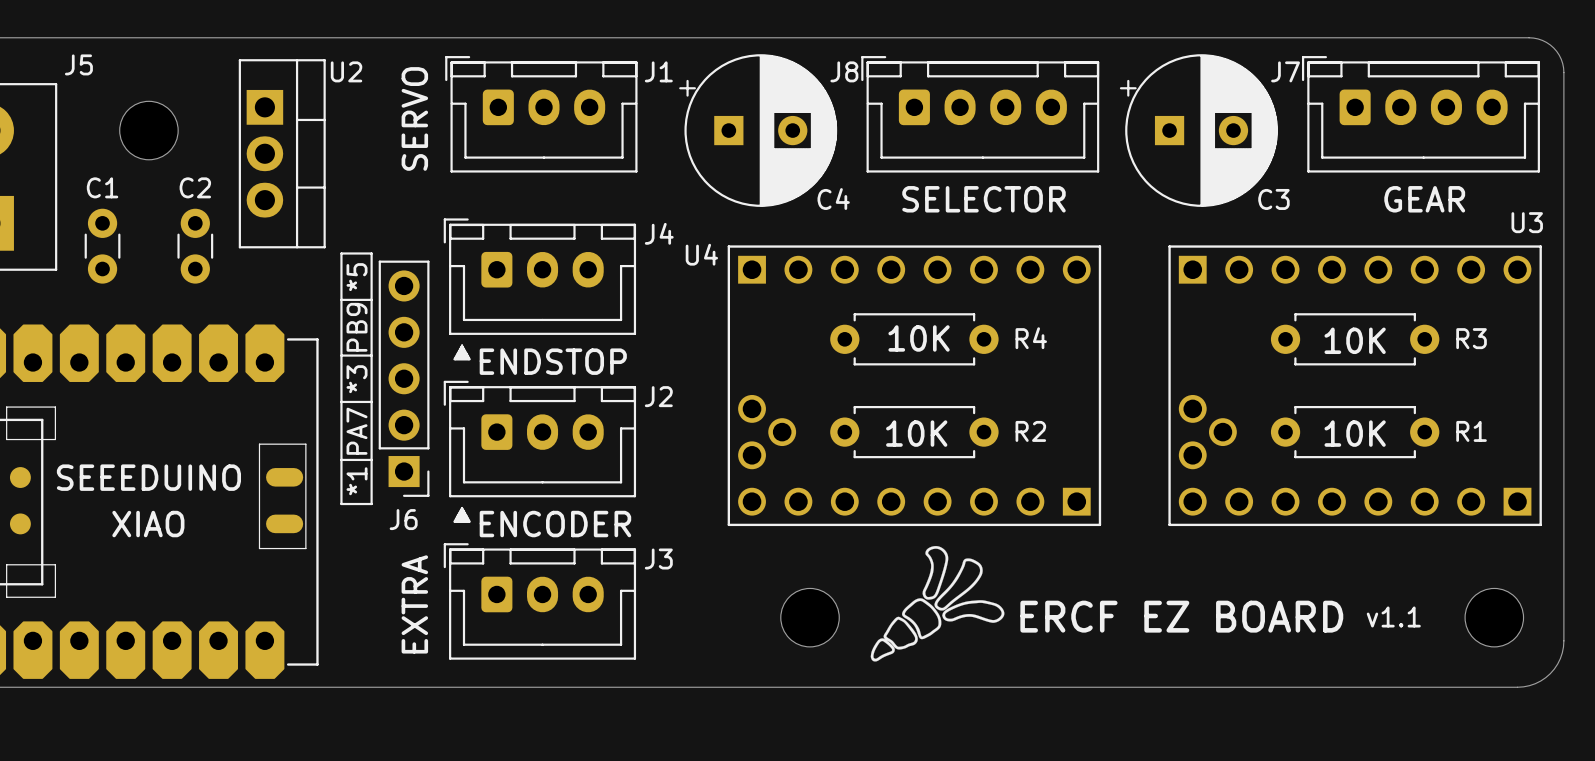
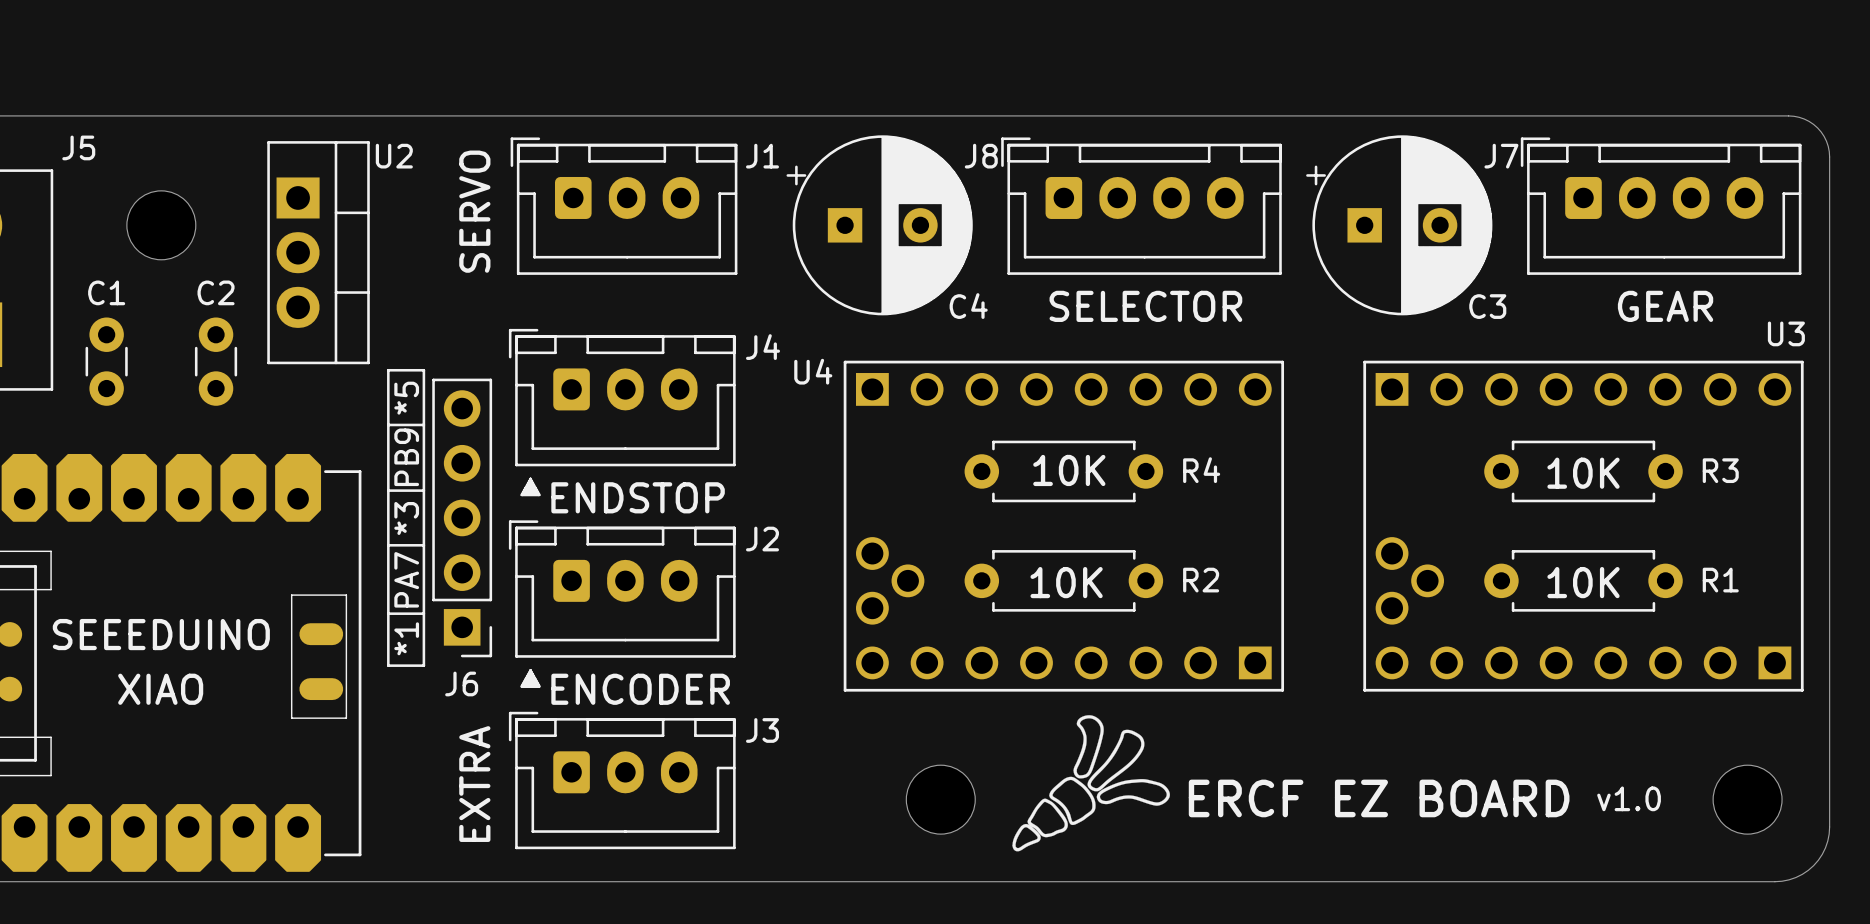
text: v1.1 (1393, 616) -> v1.0 (1629, 798)

